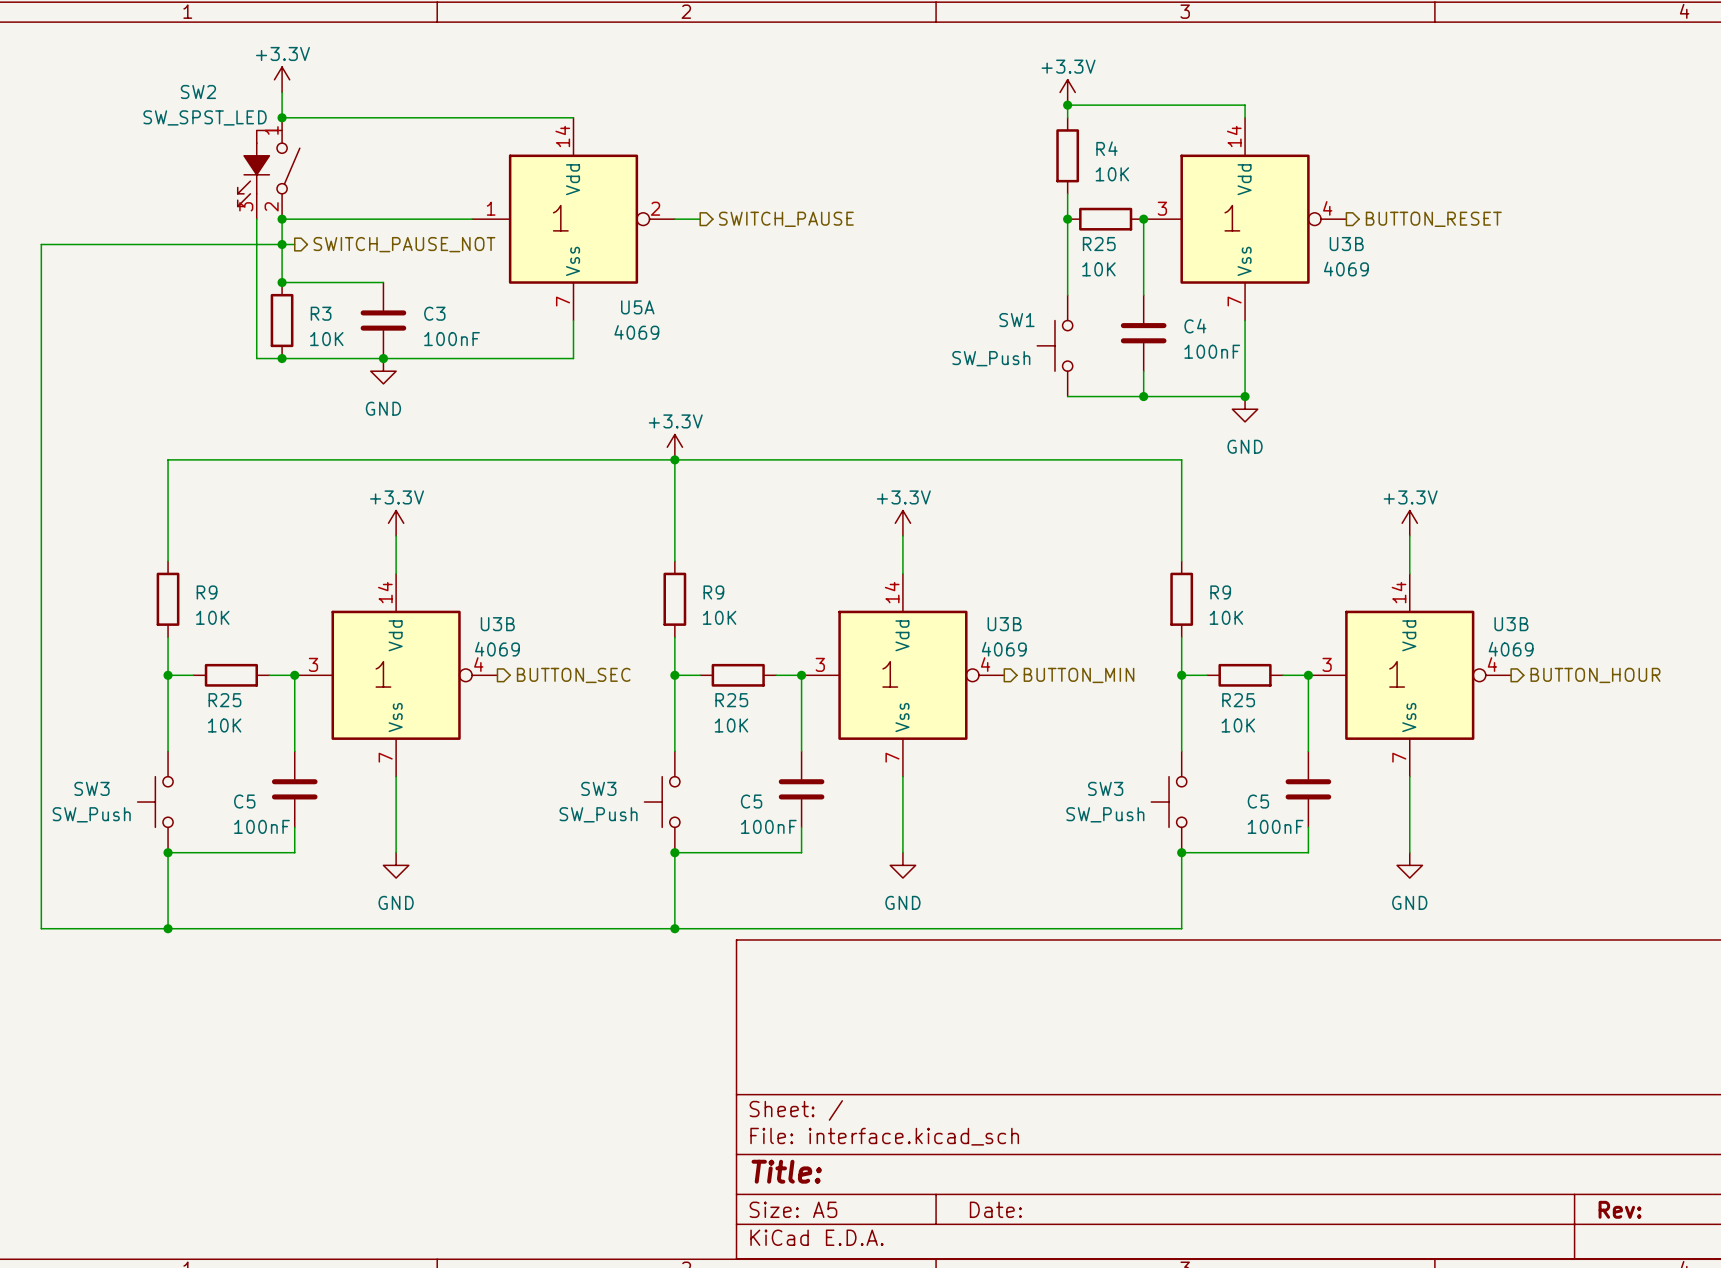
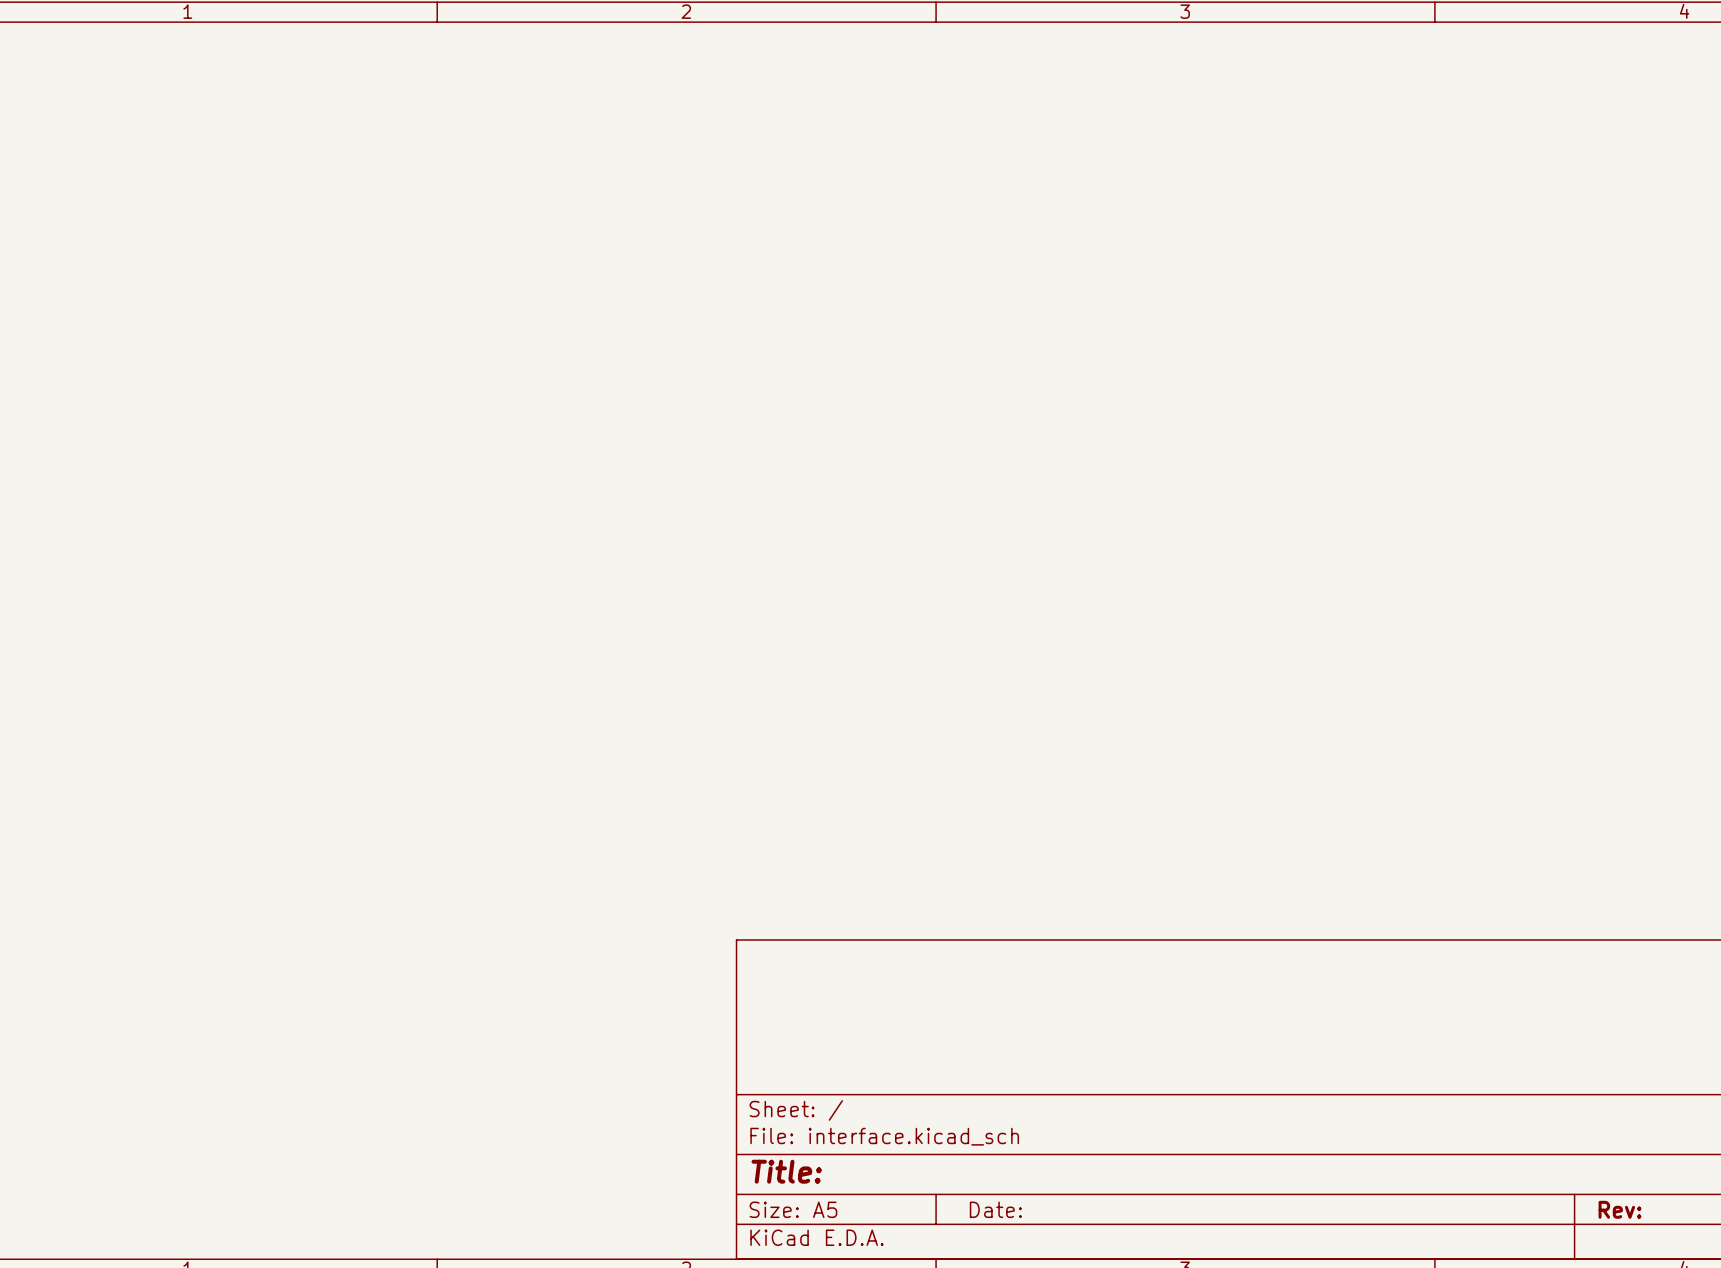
power symbol: +3.3V (282, 79) -> none
wire: (282, 92) (282, 117) (573, 117) -> none
power symbol: +3.3V (1067, 92) -> none
junction: (1067, 105) -> none
junction: (282, 117) -> none
wire: (1067, 117) (1067, 105) (1245, 105) (1245, 117) -> none
R4: 10K (1067, 155) -> none
SW2: SW_SPST_LED (268, 168) -> none
wire: (1067, 193) (1067, 295) -> none
wire: (256, 219) (256, 358) (573, 358) (573, 320) -> none
junction: (282, 219) -> none
wire: (472, 219) (282, 219) (282, 282) (383, 282) -> none
U5A: 4069 (573, 219) -> none
wire: (674, 219) (700, 219) -> none
hierarchical label: SWITCH_PAUSE (786, 219) -> none
junction: (1067, 219) -> none
R25: 10K (1105, 219) -> none
wire: (1143, 219) (1143, 295) -> none
junction: (1143, 219) -> none
U3B: 4069 (1245, 219) -> none
hierarchical label: BUTTON_RESET (1433, 219) -> none
junction: (282, 244) -> none
wire: (294, 244) (41, 244) (41, 928) (1181, 928) (1181, 852) (1308, 852) (1308, 827) -> none
hierarchical label: SWITCH_PAUSE_NOT (404, 244) -> none
junction: (282, 282) -> none
R3: 10K (282, 320) -> none
C3: 100nF (383, 320) -> none
wire: (1245, 320) (1245, 396) (1067, 396) -> none
C4: 100nF (1143, 333) -> none
SW1: SW_Push (1054, 345) -> none
junction: (282, 358) -> none
junction: (383, 358) -> none
power symbol: GND (383, 371) -> none
wire: (1143, 371) (1143, 396) -> none
junction: (1143, 396) -> none
junction: (1245, 396) -> none
power symbol: GND (1245, 409) -> none
power symbol: +3.3V (674, 447) -> none
wire: (674, 459) (674, 561) -> none
junction: (674, 459) -> none
power symbol: +3.3V (396, 523) -> none
power symbol: +3.3V (902, 523) -> none
power symbol: +3.3V (1409, 523) -> none
wire: (396, 535) (396, 573) -> none
wire: (902, 535) (902, 573) -> none
wire: (1409, 535) (1409, 573) -> none
wire: (168, 561) (168, 459) (1181, 459) (1181, 561) -> none
R9: 10K (168, 599) -> none
R9: 10K (674, 599) -> none
R9: 10K (1181, 599) -> none
wire: (168, 637) (168, 751) -> none
wire: (674, 637) (674, 751) -> none
wire: (1181, 637) (1181, 751) -> none
wire: (168, 675) (193, 675) -> none
junction: (168, 675) -> none
R25: 10K (231, 675) -> none
wire: (269, 675) (294, 675) (294, 751) -> none
junction: (294, 675) -> none
U3B: 4069 (396, 675) -> none
hierarchical label: BUTTON_SEC (573, 675) -> none
wire: (674, 675) (700, 675) -> none
junction: (674, 675) -> none
R25: 10K (738, 675) -> none
wire: (776, 675) (801, 675) (801, 751) -> none
junction: (801, 675) -> none
U3B: 4069 (902, 675) -> none
hierarchical label: BUTTON_MIN (1079, 675) -> none
wire: (1181, 675) (1207, 675) -> none
junction: (1181, 675) -> none
R25: 10K (1245, 675) -> none
wire: (1283, 675) (1308, 675) (1308, 751) -> none
junction: (1308, 675) -> none
U3B: 4069 (1409, 675) -> none
hierarchical label: BUTTON_HOUR (1595, 675) -> none
wire: (396, 776) (396, 852) -> none
wire: (902, 776) (902, 852) -> none
wire: (1409, 776) (1409, 852) -> none
C5: 100nF (294, 789) -> none
C5: 100nF (801, 789) -> none
C5: 100nF (1308, 789) -> none
SW3: SW_Push (155, 802) -> none
SW3: SW_Push (662, 802) -> none
SW3: SW_Push (1169, 802) -> none
wire: (294, 827) (294, 852) (168, 852) (168, 928) -> none
wire: (801, 827) (801, 852) (674, 852) (674, 928) -> none
junction: (168, 852) -> none
junction: (674, 852) -> none
junction: (1181, 852) -> none
power symbol: GND (396, 865) -> none
power symbol: GND (902, 865) -> none
power symbol: GND (1409, 865) -> none
junction: (168, 928) -> none
junction: (674, 928) -> none

